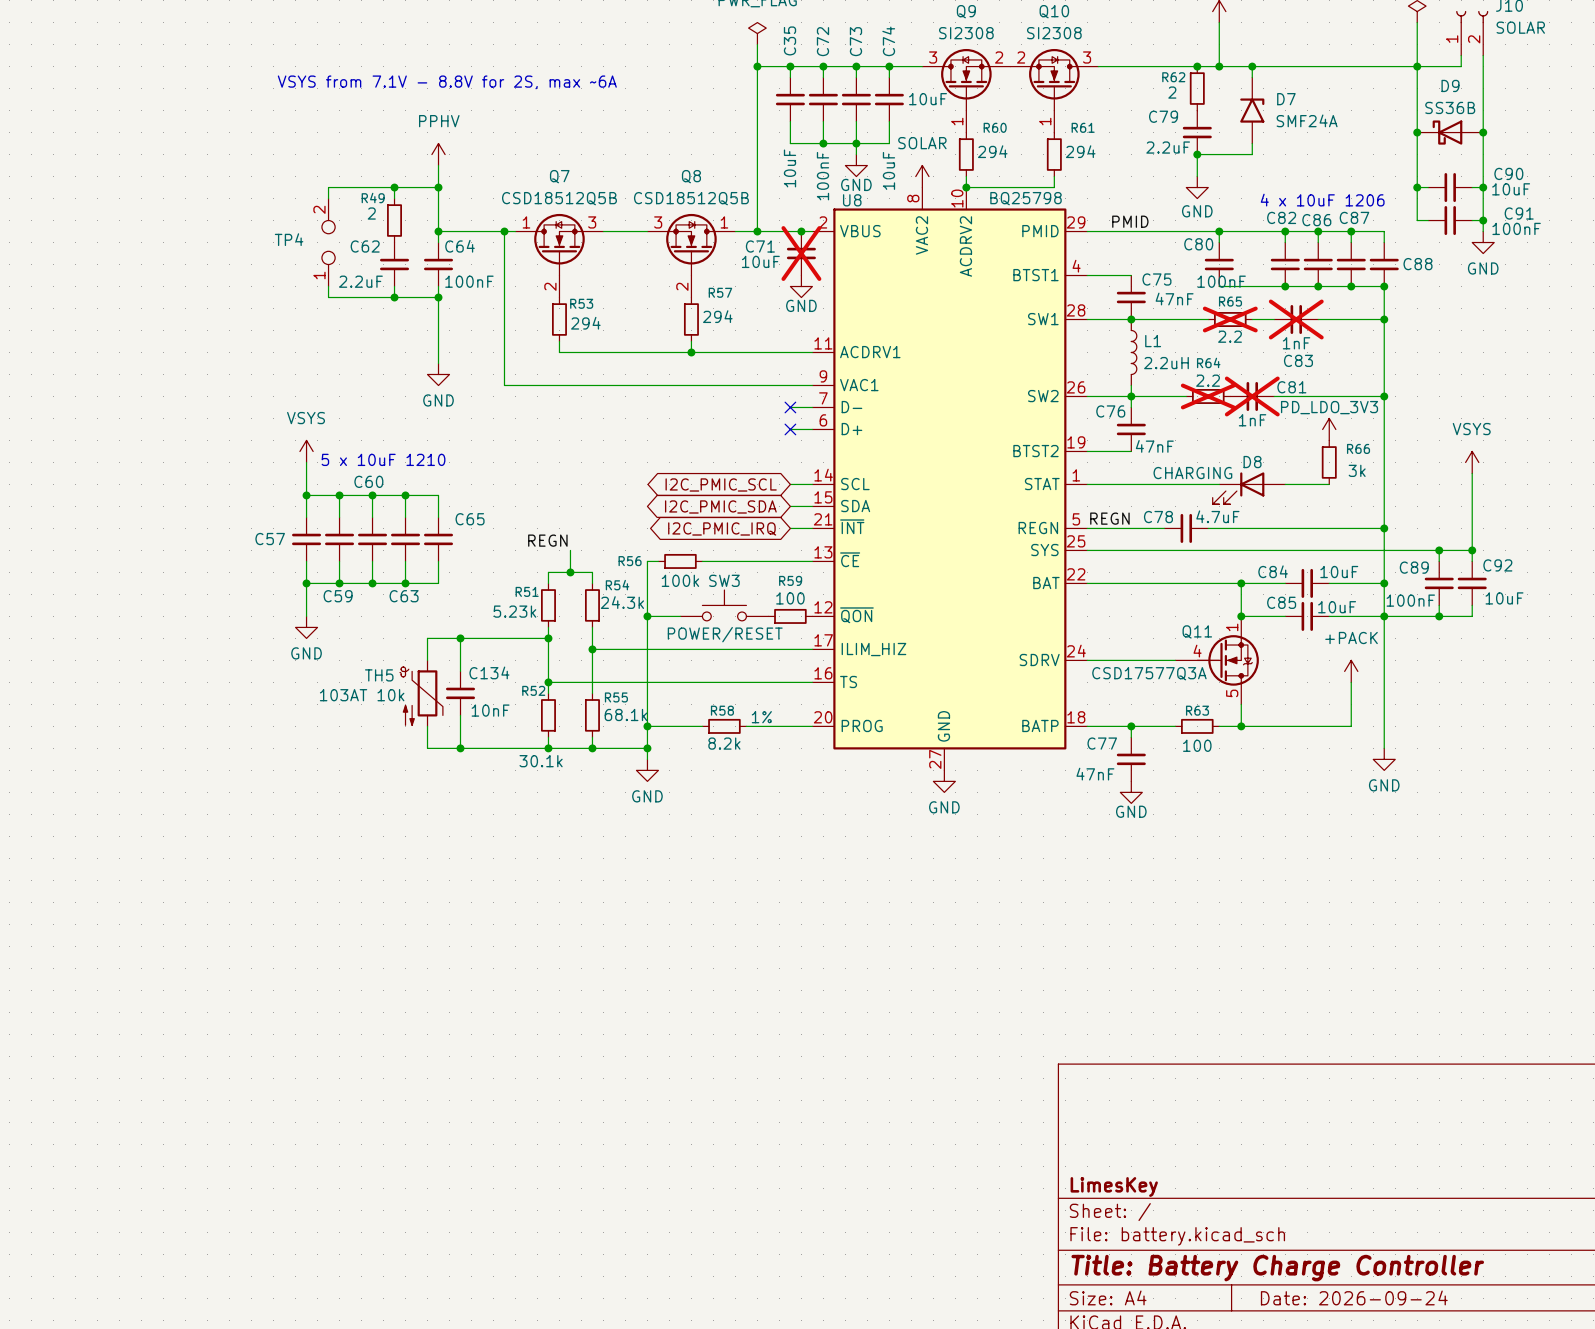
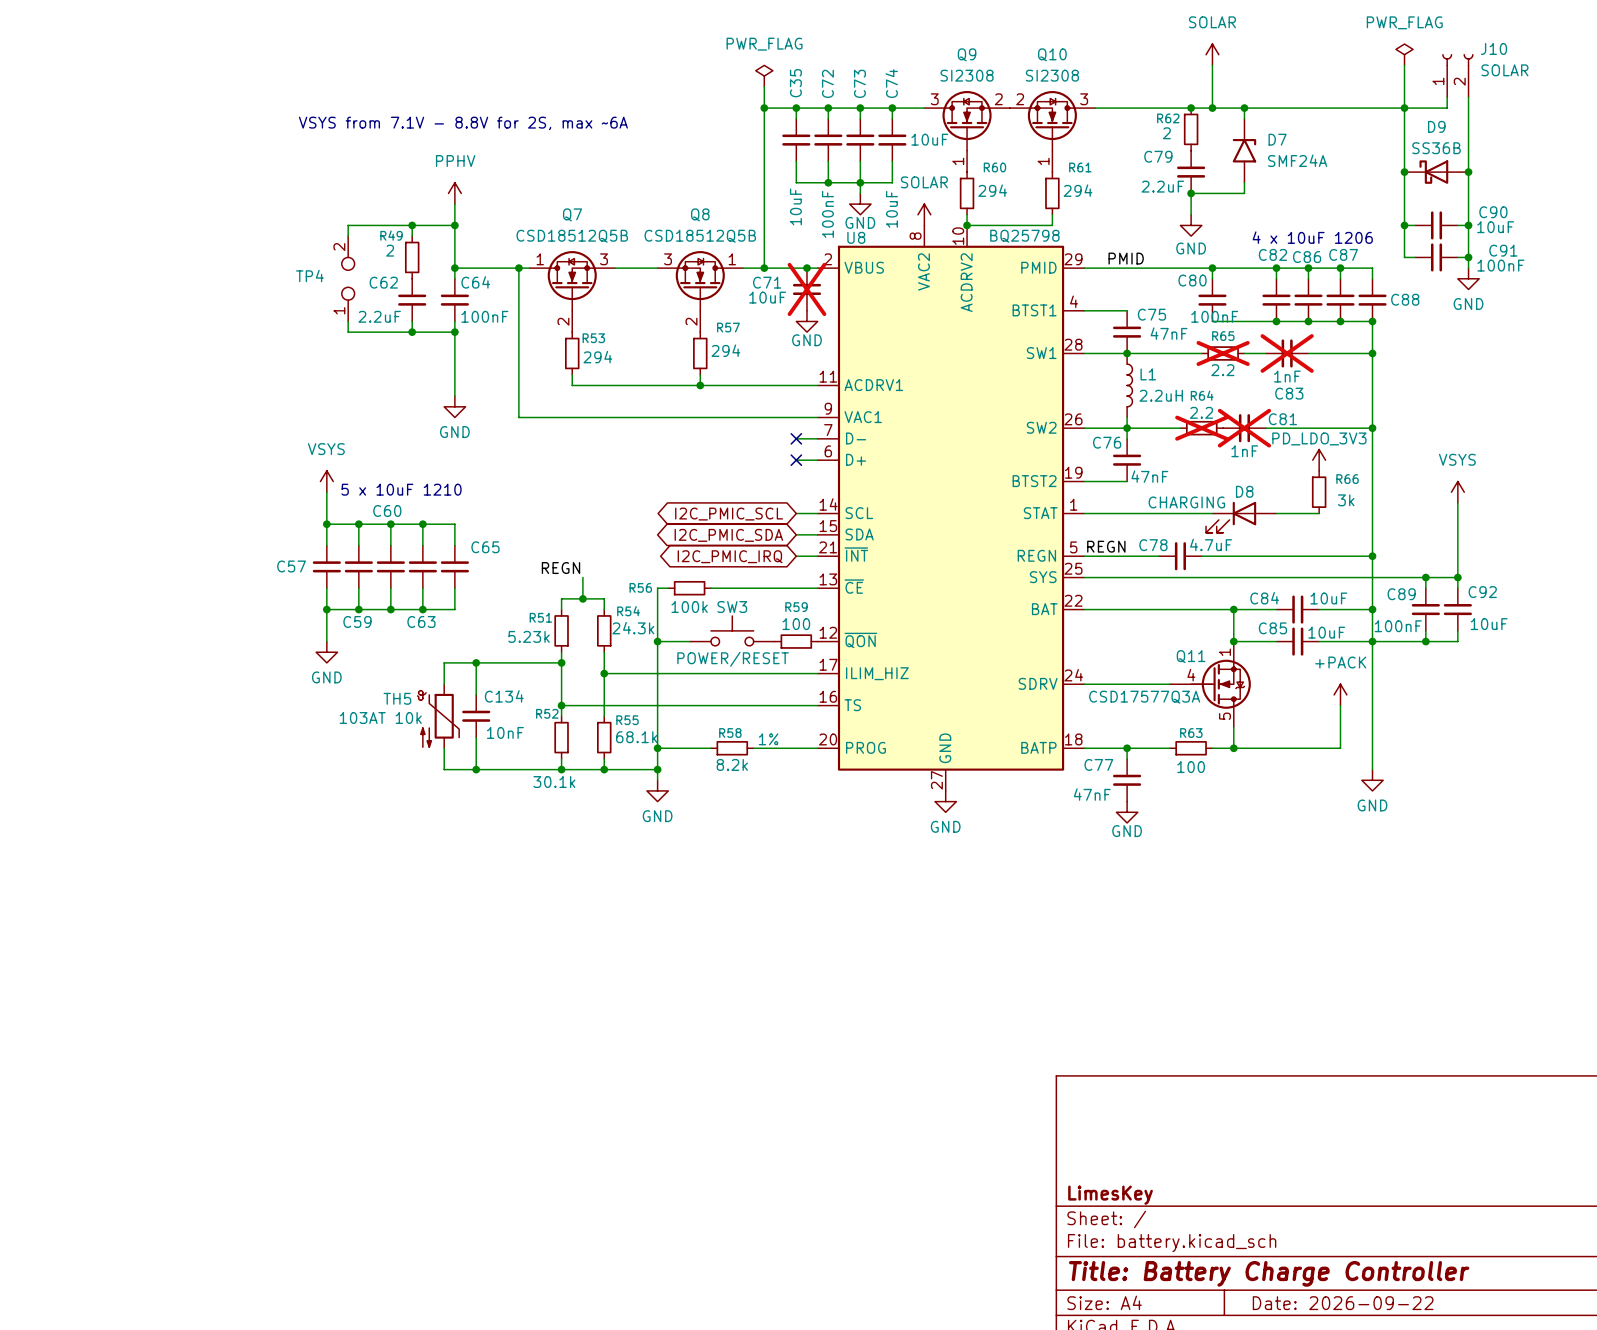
title block: Date: 2026-09-24 (1354, 1297) -> Date: 2026-09-22 (1343, 1303)

